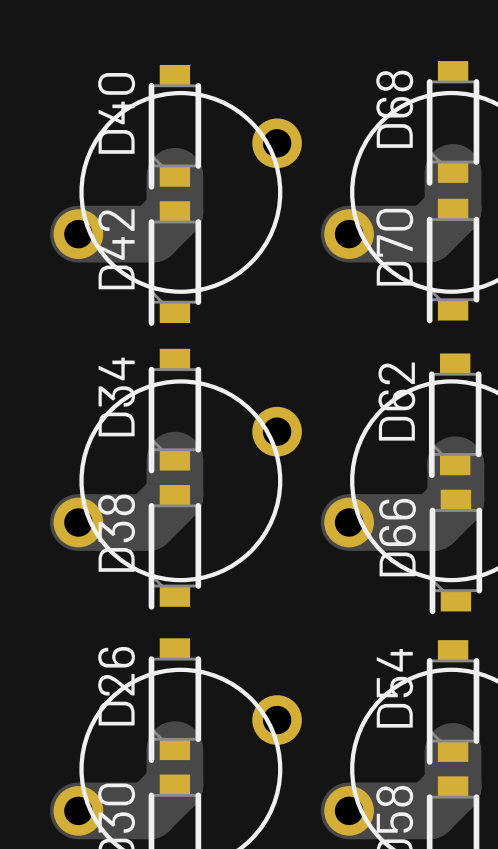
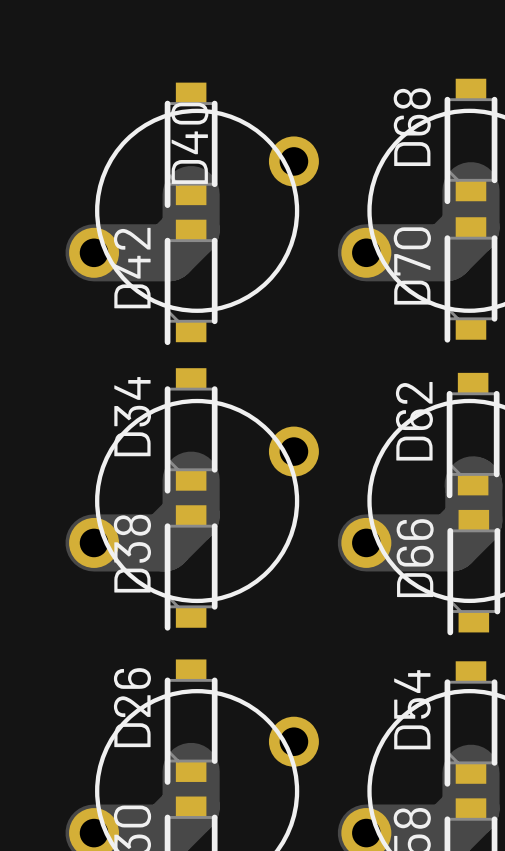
D40 name position: D40 (116, 113) -> D40 (189, 143)

